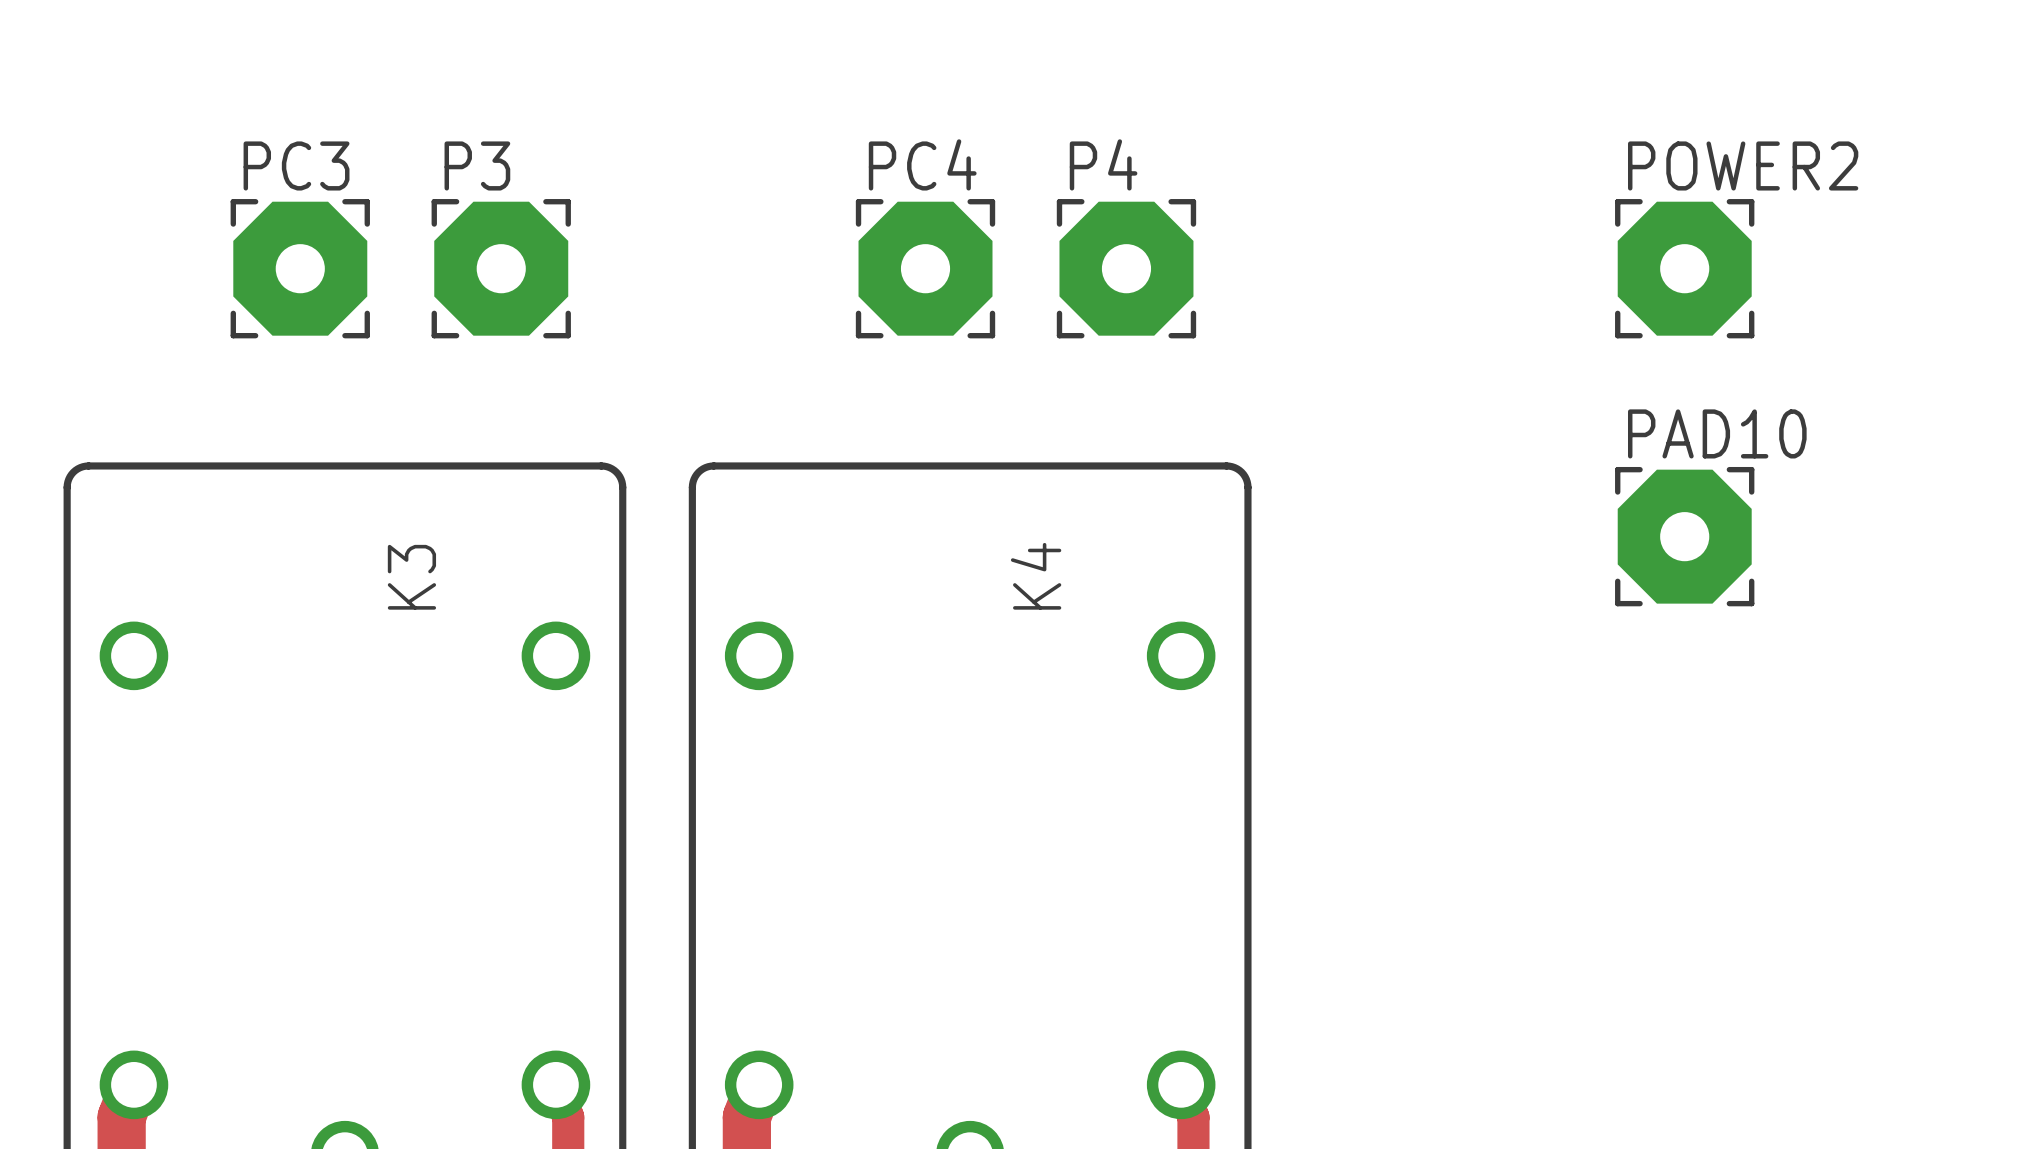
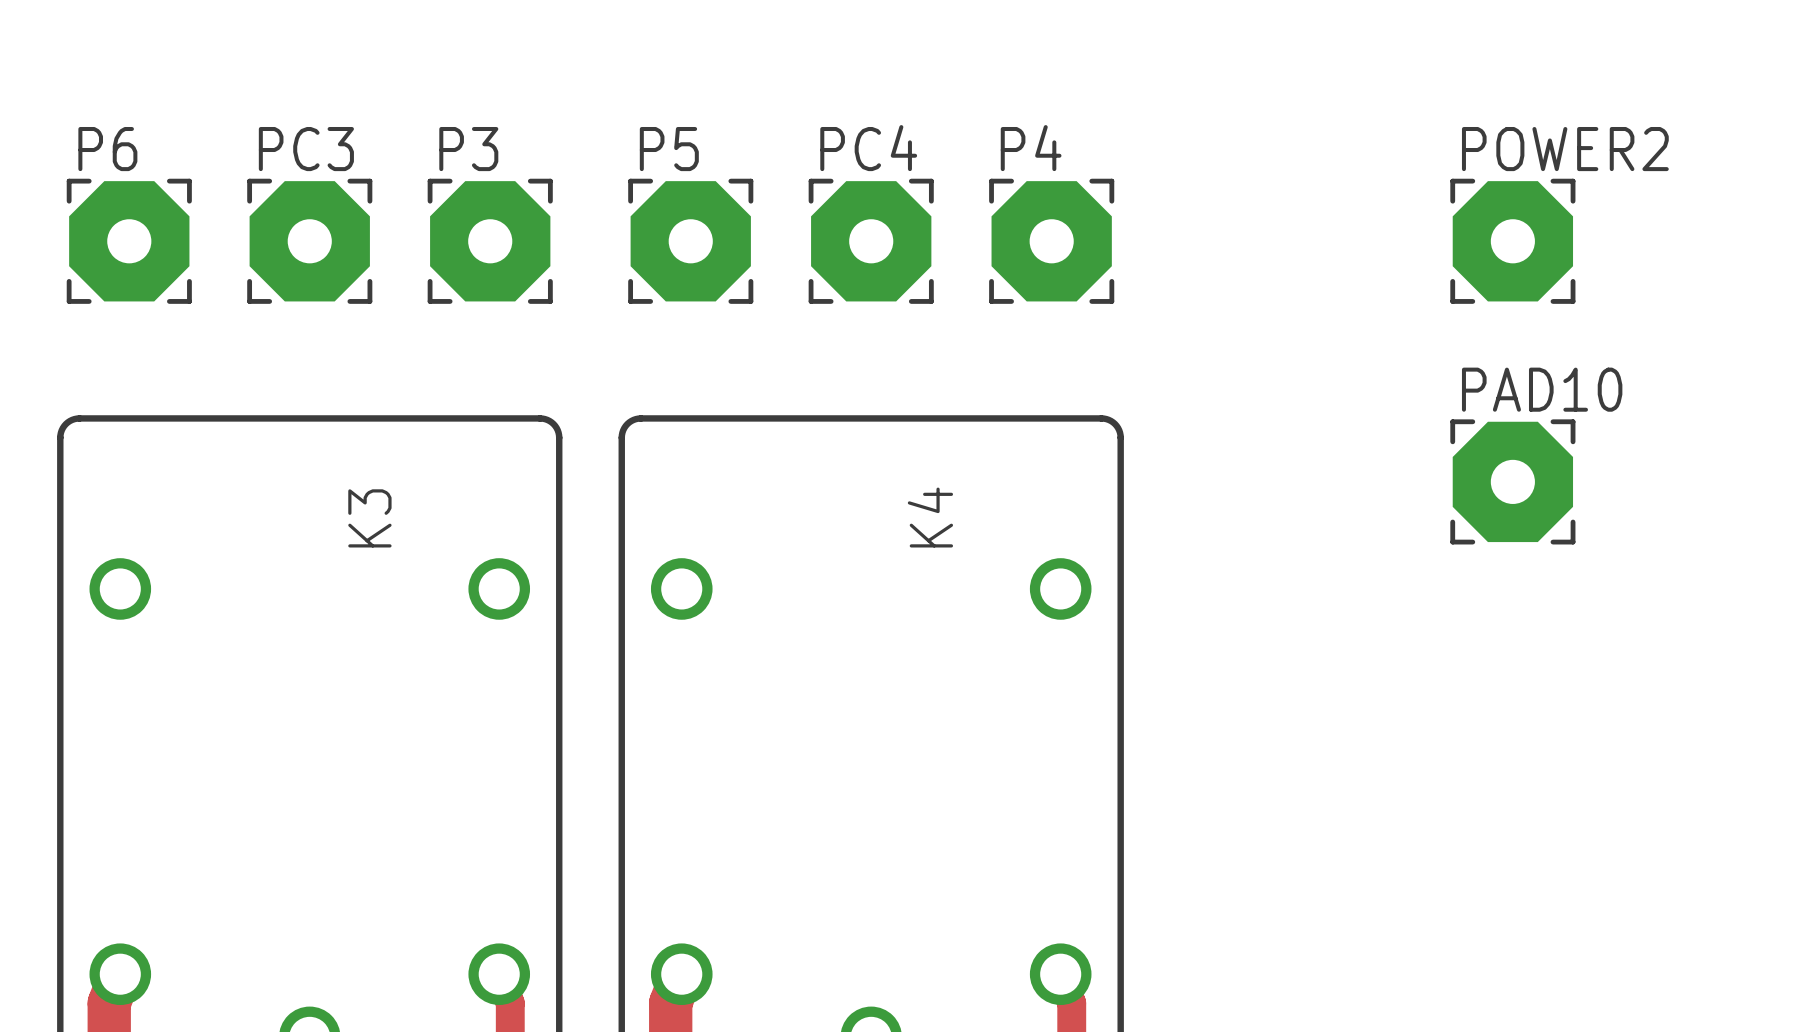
P6: none -> (129, 241)
PC3 position: (300, 268) -> (309, 241)
P3 position: (501, 268) -> (490, 241)
P5: none -> (690, 241)
PC4 position: (925, 268) -> (871, 241)
P4 position: (1126, 268) -> (1051, 241)

